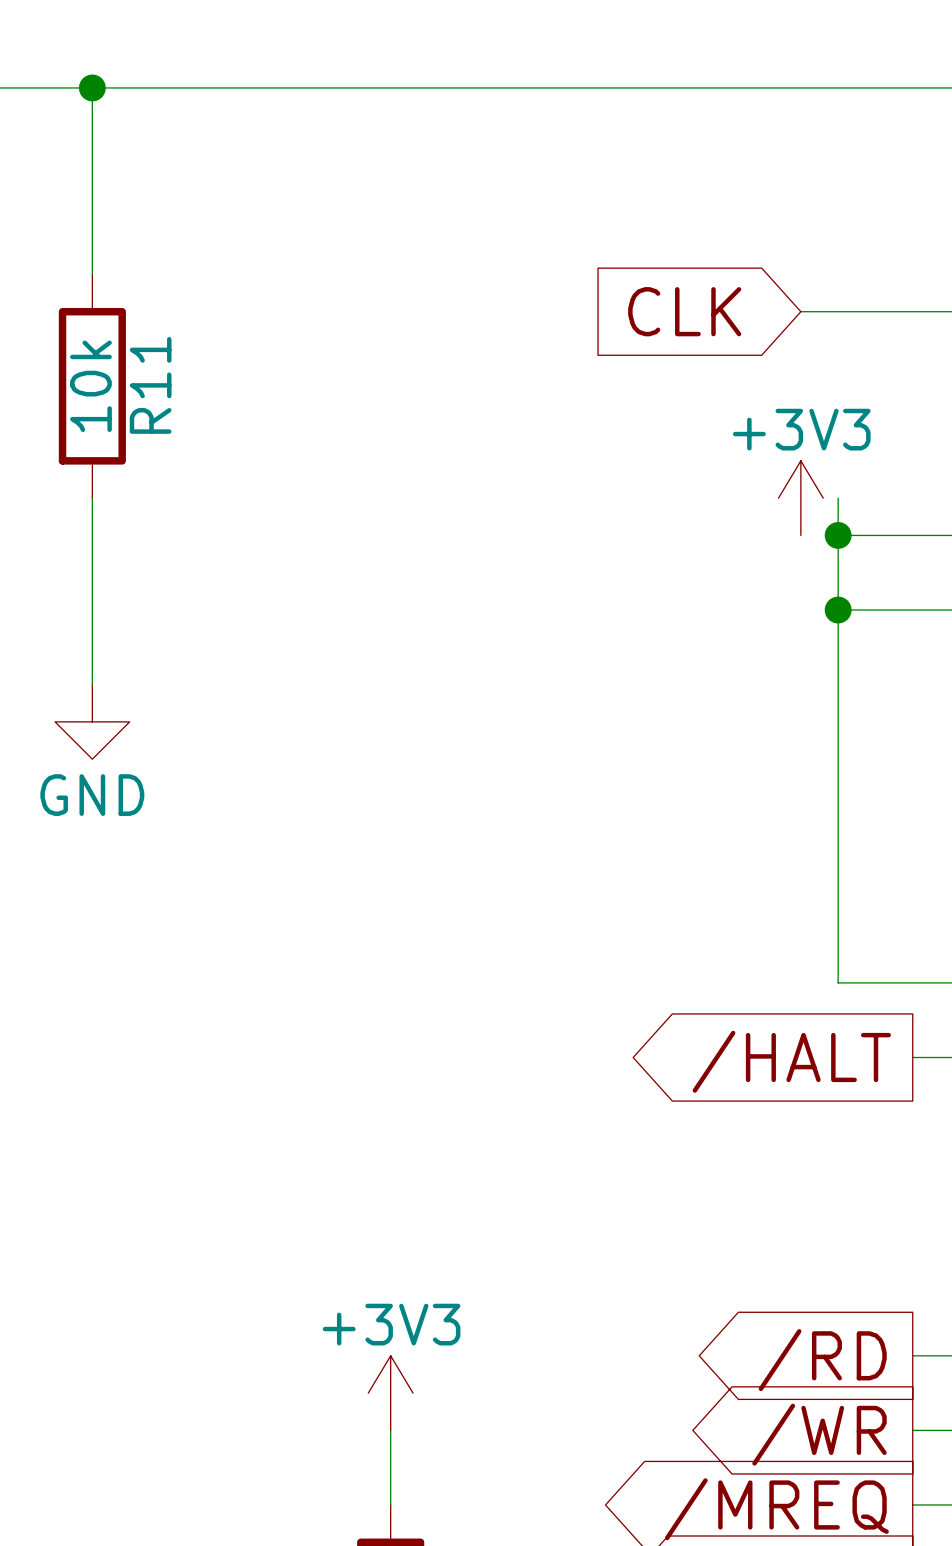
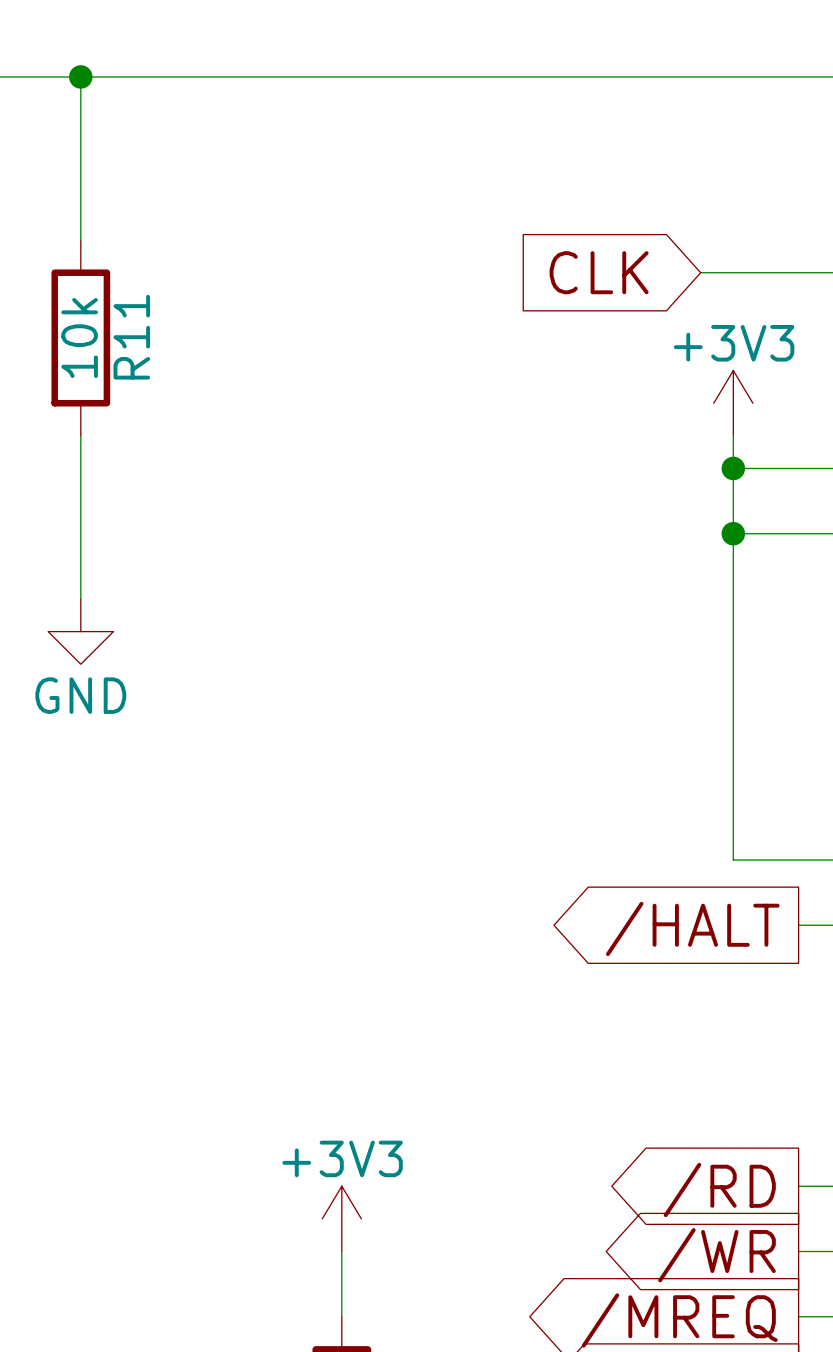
power symbol position: +3V3 (800, 498) -> +3V3 (733, 403)

